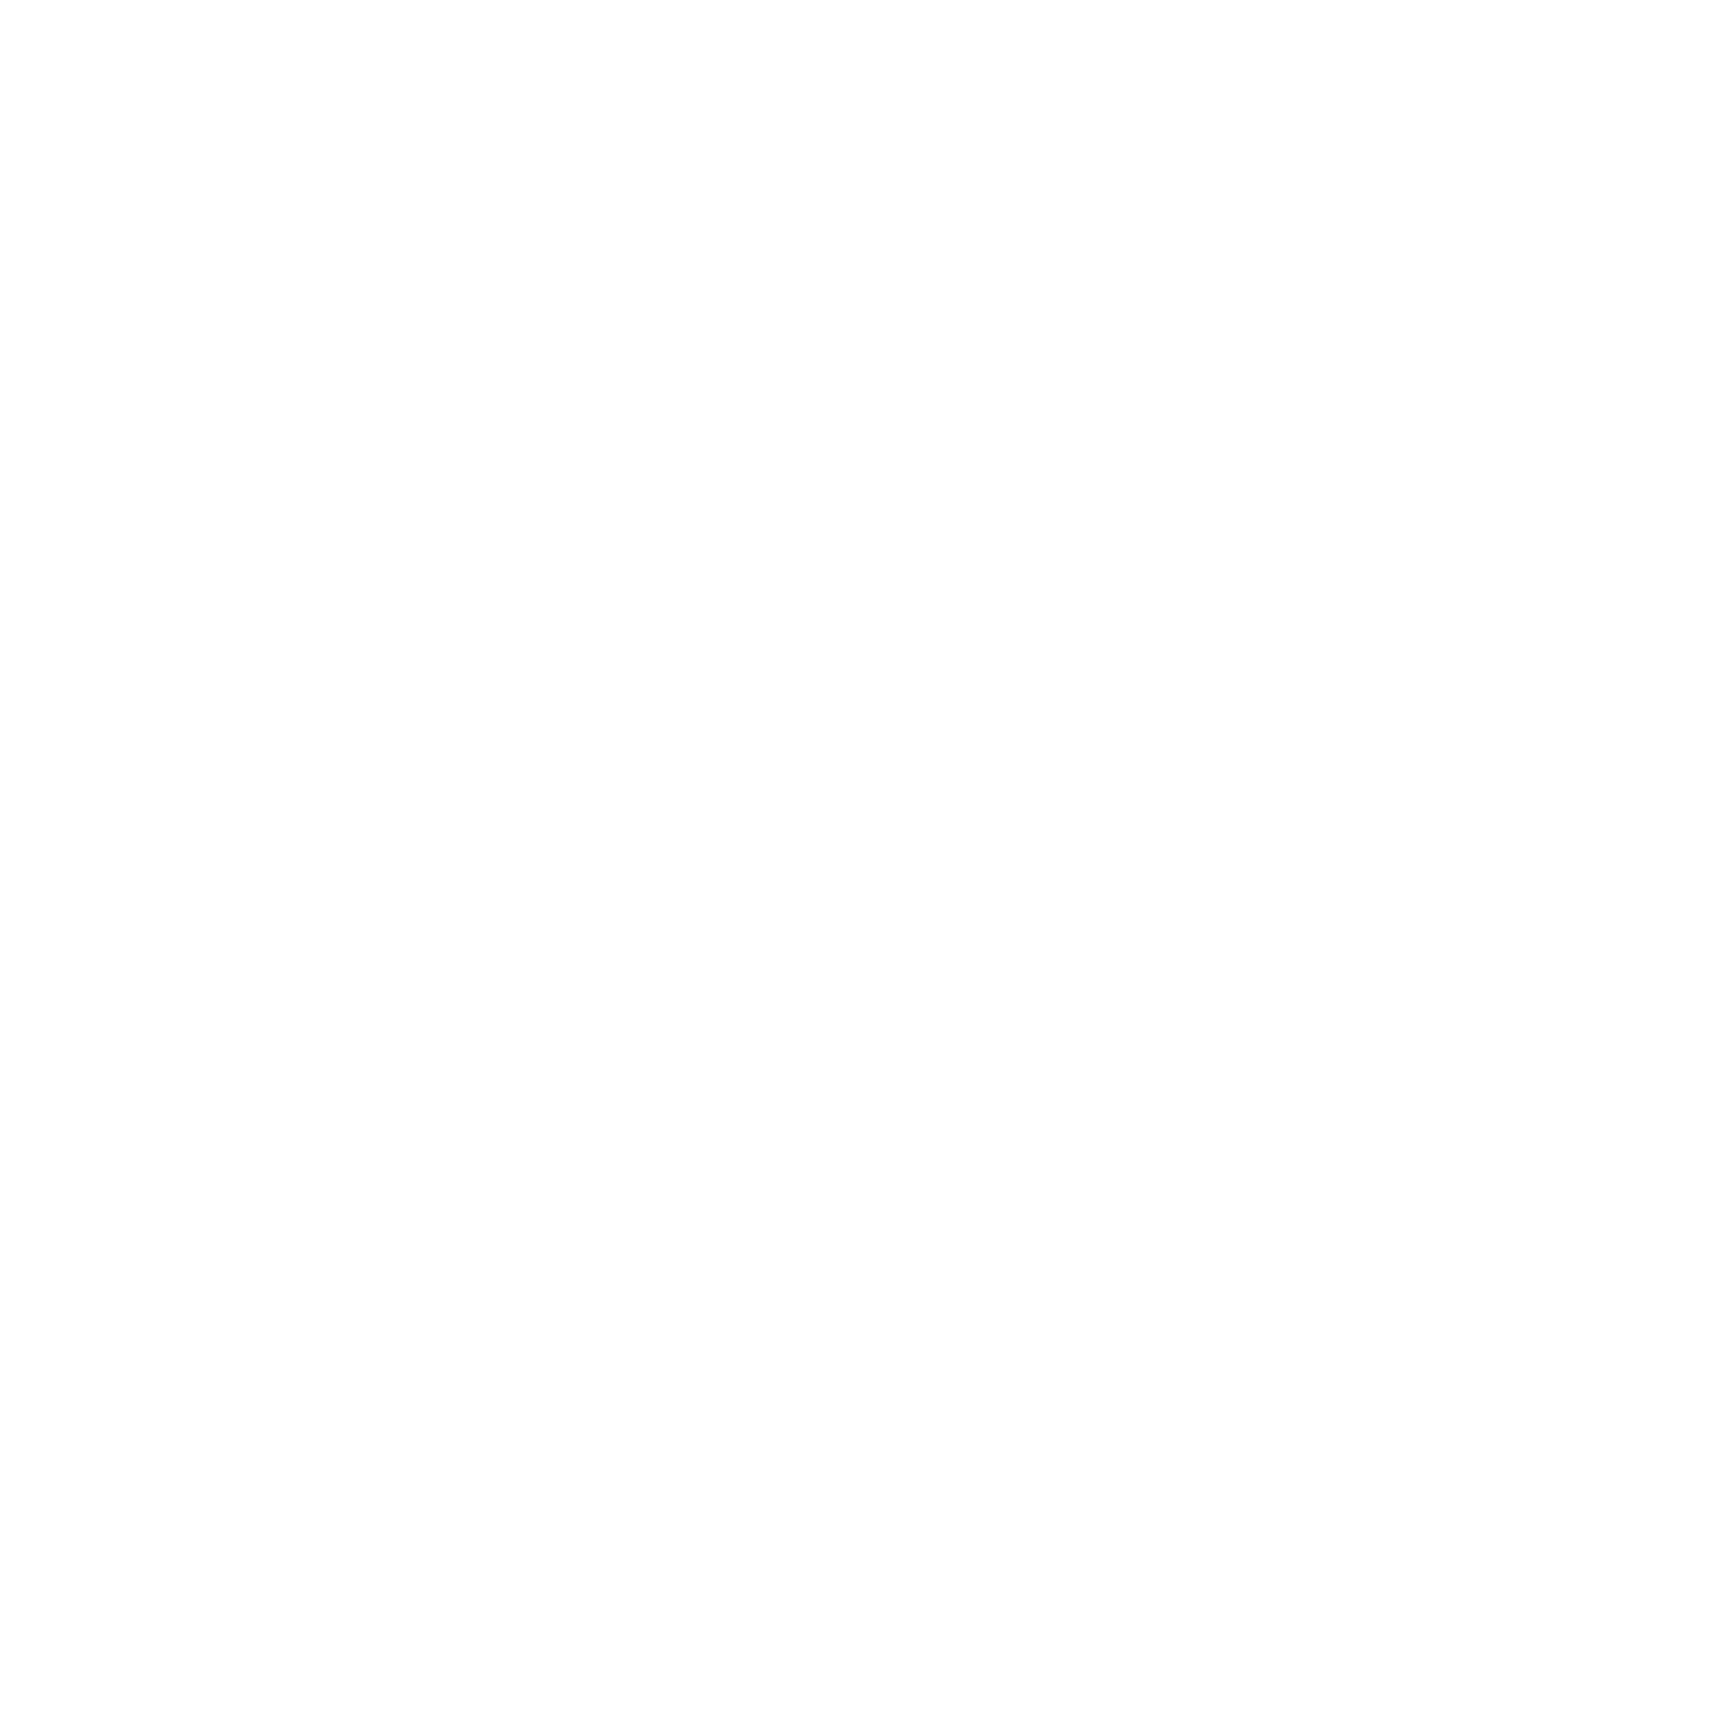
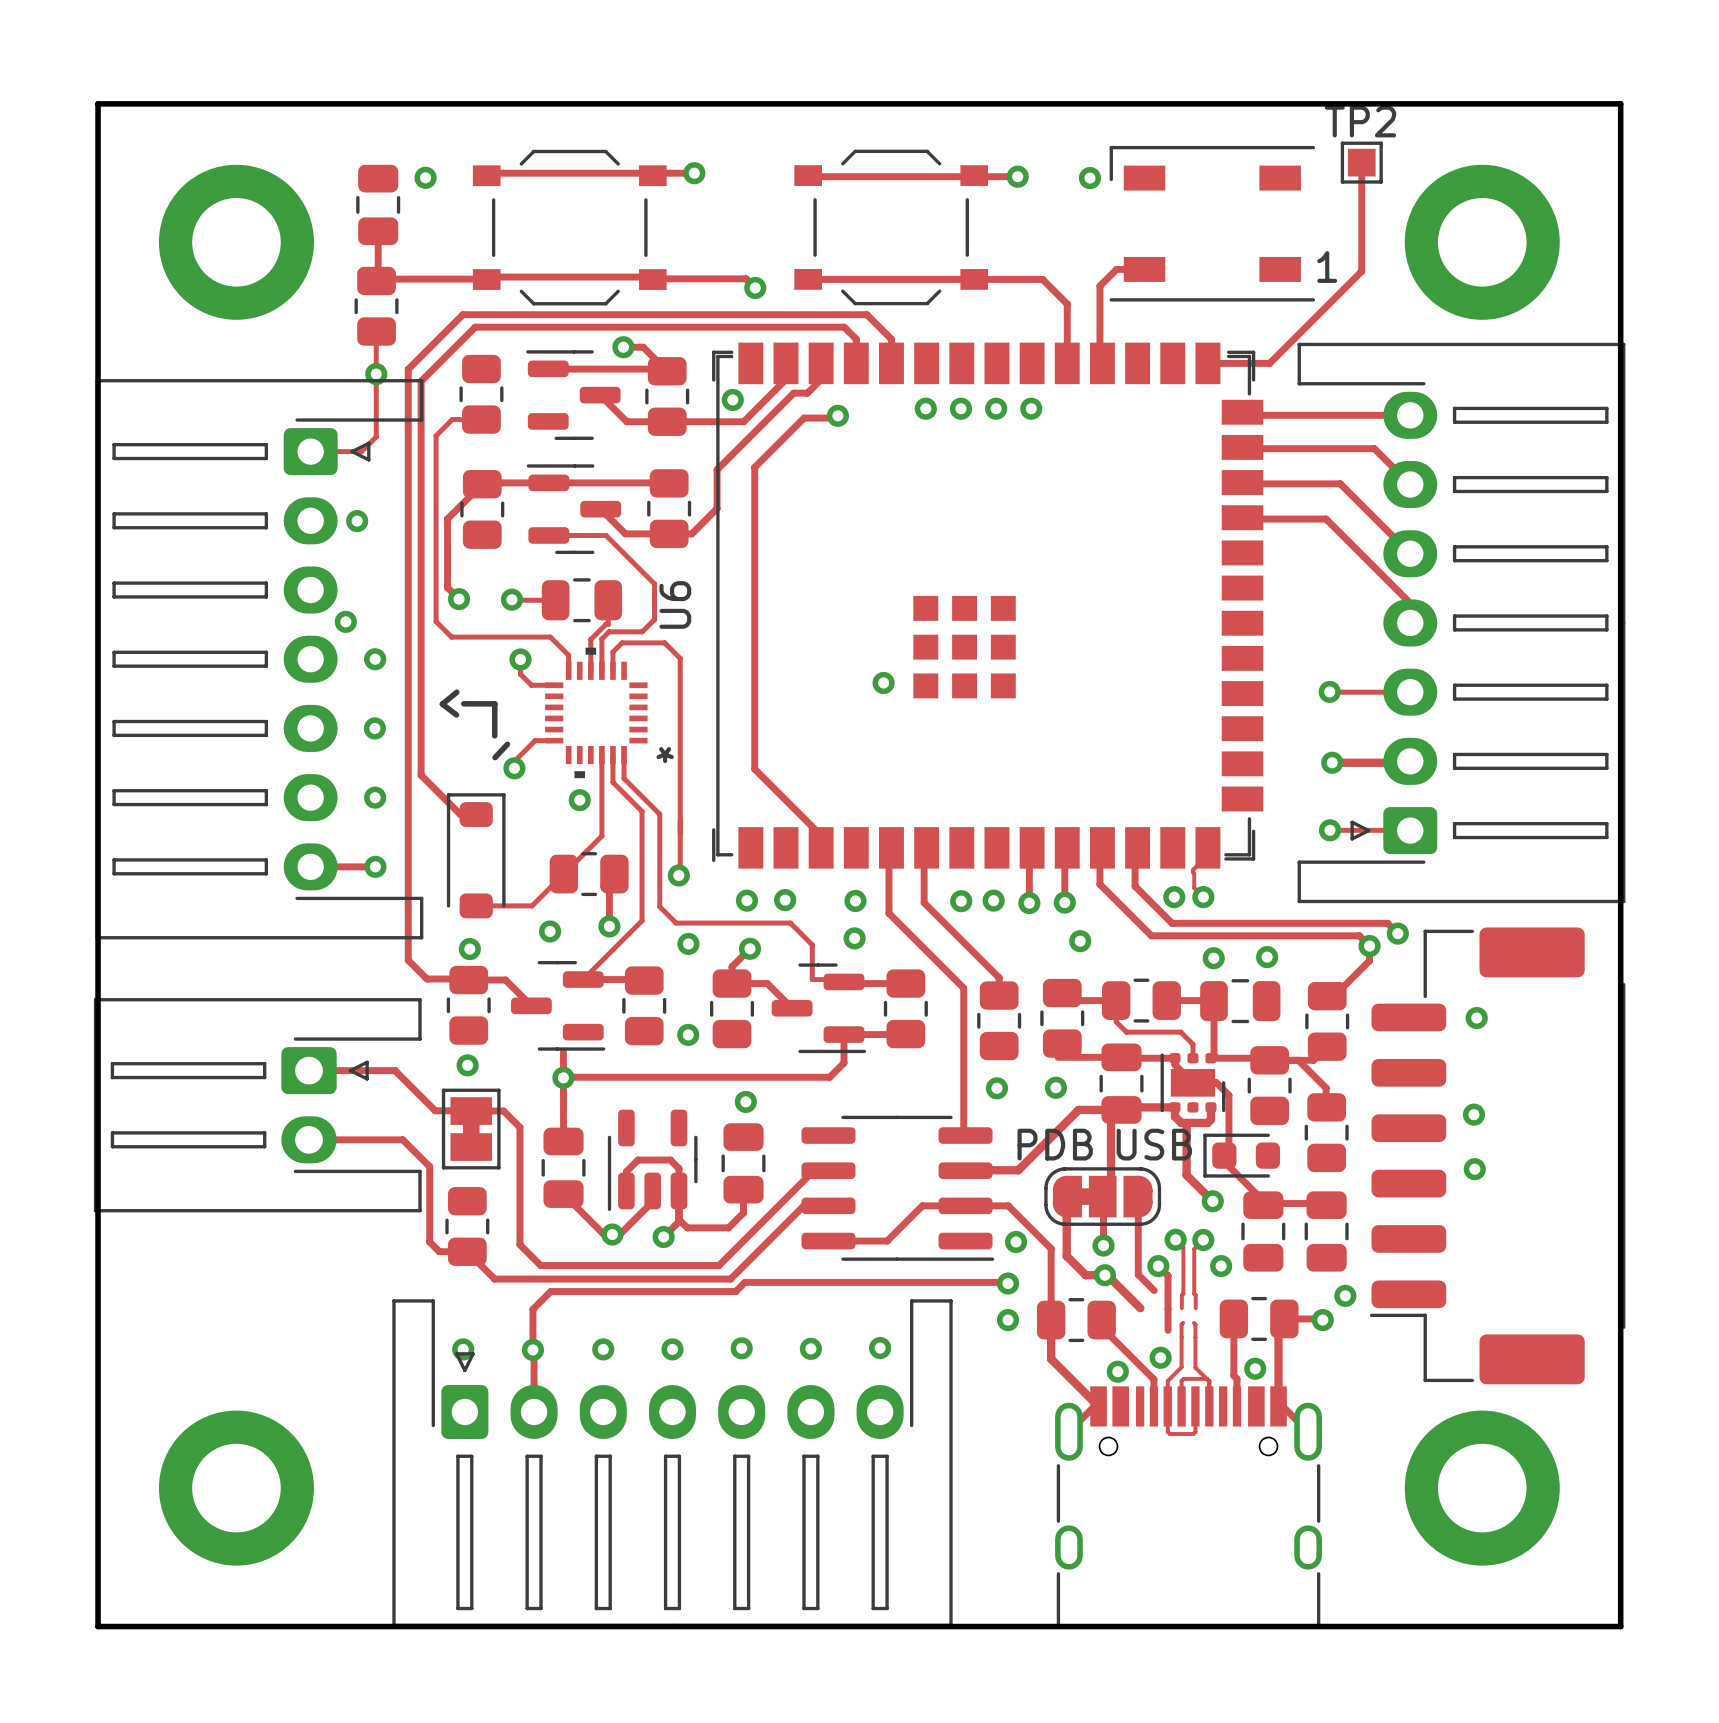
board edge: none -> (98, 103) (1620, 103) (1620, 1626) (98, 1626) (98, 103)
TP2: none -> (1361, 162)
track: none -> (809, 169) (816, 176) (1017, 176)
track: none -> (1361, 169) (1361, 271) (1269, 363) (1207, 363)
track: none -> (694, 173) (483, 173) (481, 175)
via: none -> (694, 173)
via: none -> (1017, 176)
via: none -> (425, 177)
via: none -> (1089, 178)
part: none -> (378, 204)
part: none -> (1212, 223)
part: none -> (569, 227)
part: none -> (891, 227)
track: none -> (378, 231) (378, 279)
part: none -> (236, 242)
part: none -> (1482, 242)
track: none -> (1144, 269) (1116, 269) (1099, 286) (1099, 364)
track: none -> (808, 279) (1042, 279) (1067, 304) (1066, 364)
track: none -> (376, 280) (378, 279) (481, 279) (483, 277) (650, 277) (651, 278) (746, 278) (755, 287)
via: none -> (755, 287)
part: none -> (376, 306)
track: none -> (376, 331) (376, 436) (361, 451) (310, 451)
track: none -> (623, 347) (643, 347) (667, 371)
via: none -> (623, 347)
track: none -> (785, 363) (785, 379) (743, 421) (626, 421) (600, 395)
track: none -> (821, 363) (821, 379) (807, 393) (793, 393) (717, 469) (717, 508) (691, 533) (625, 533) (600, 509)
track: none -> (891, 363) (891, 339) (866, 314) (462, 314) (408, 369) (408, 960) (426, 978) (505, 980) (531, 1005)
track: none -> (548, 369) (665, 369)
via: none -> (376, 374)
track: none -> (856, 379) (856, 339) (844, 327) (475, 327) (421, 381) (421, 775) (460, 814) (476, 814)
part: none -> (481, 394)
part: none -> (573, 395)
part: none -> (667, 396)
via: none -> (732, 399)
via: none -> (925, 408)
via: none -> (960, 408)
via: none -> (996, 408)
via: none -> (1031, 408)
track: none -> (1240, 413) (1241, 415) (1410, 415)
track: none -> (837, 415) (835, 418) (804, 418) (754, 467) (754, 769) (818, 833) (818, 849)
via: none -> (837, 415)
track: none -> (479, 419) (481, 419) (452, 419) (436, 435) (436, 621) (451, 637) (550, 637) (568, 655) (568, 670)
track: none -> (1240, 448) (1374, 448) (1410, 484)
track: none -> (669, 483) (483, 482) (447, 518) (447, 587) (459, 599)
track: none -> (1240, 483) (1340, 483) (1410, 553)
part: none -> (669, 508)
part: none -> (482, 509)
part: none -> (573, 509)
track: none -> (1240, 519) (1326, 519) (1410, 603) (1410, 622)
via: none -> (357, 521)
track: none -> (554, 535) (548, 535) (606, 535) (654, 583) (654, 619) (642, 631) (609, 631) (601, 639) (601, 670)
via: none -> (459, 599)
track: none -> (511, 599) (555, 600)
via: none -> (511, 599)
part: none -> (581, 600)
track: none -> (608, 600) (608, 624) (590, 639) (590, 670)
U6: none -> (987, 605)
via: none -> (345, 621)
part: none -> (1461, 622)
part: none -> (259, 659)
via: none -> (375, 659)
track: none -> (520, 659) (520, 674) (531, 685) (554, 685)
via: none -> (520, 659)
track: none -> (612, 670) (612, 652) (622, 642) (664, 642) (680, 658) (678, 875)
via: none -> (883, 682)
via: none -> (1329, 691)
line: none -> (456, 692) (442, 704) (456, 714)
track: none -> (1330, 692) (1410, 692)
line: none -> (463, 703) (494, 703) (494, 735)
part: none -> (596, 712)
via: none -> (374, 728)
track: none -> (554, 740) (535, 740) (514, 761) (514, 768)
line: none -> (507, 744) (495, 757)
track: none -> (601, 755) (601, 836) (532, 905) (476, 905)
track: none -> (612, 755) (612, 782) (642, 811) (642, 920) (583, 979) (644, 980)
track: none -> (624, 755) (624, 778) (659, 814) (659, 906) (676, 923) (790, 923) (812, 944) (812, 979) (841, 979) (845, 983) (905, 983)
track: none -> (1410, 761) (1332, 762)
via: none -> (1332, 762)
via: none -> (514, 768)
via: none -> (375, 797)
via: none -> (579, 800)
track: none -> (1330, 830) (1410, 830)
via: none -> (1330, 830)
track: none -> (888, 849) (888, 913) (963, 988) (963, 1133) (965, 1135)
track: none -> (924, 849) (924, 902) (999, 977) (999, 995)
track: none -> (1029, 849) (1029, 903)
track: none -> (1064, 849) (1064, 902)
track: none -> (1099, 849) (1099, 884) (1151, 935) (1359, 935) (1369, 946) (1369, 960) (1334, 996) (1327, 996)
track: none -> (1135, 849) (1135, 886) (1172, 923) (1387, 923) (1397, 933)
track: none -> (1205, 849) (1205, 857) (1193, 869) (1194, 888) (1203, 897)
part: none -> (476, 855)
track: none -> (310, 866) (375, 866)
via: none -> (375, 866)
part: none -> (589, 874)
via: none -> (678, 875)
track: none -> (603, 886) (609, 891) (609, 926)
via: none -> (1174, 897)
via: none -> (1203, 897)
via: none -> (746, 900)
via: none -> (785, 900)
via: none -> (855, 900)
via: none -> (993, 900)
via: none -> (961, 901)
via: none -> (1064, 902)
via: none -> (1029, 903)
via: none -> (609, 926)
via: none -> (550, 931)
via: none -> (1397, 933)
via: none -> (854, 938)
via: none -> (1080, 941)
via: none -> (688, 943)
via: none -> (1369, 946)
track: none -> (750, 948) (732, 966) (732, 983) (767, 983) (792, 1008)
via: none -> (750, 948)
via: none -> (469, 949)
via: none -> (1267, 957)
via: none -> (1213, 958)
track: none -> (1062, 993) (1069, 1000) (1116, 1000) (1116, 1021) (1126, 1032) (1180, 1032) (1192, 1044) (1192, 1058)
part: none -> (1141, 1000)
track: none -> (1166, 1000) (1214, 1001) (1214, 1055) (1210, 1058) (1313, 1060) (1327, 1046)
part: none -> (1240, 1001)
part: none -> (468, 1005)
part: none -> (558, 1005)
part: none -> (644, 1005)
part: none -> (732, 1008)
part: none -> (818, 1008)
part: none -> (905, 1008)
part: none -> (1062, 1018)
via: none -> (1476, 1018)
part: none -> (999, 1020)
part: none -> (1327, 1021)
via: none -> (688, 1034)
track: none -> (905, 1034) (843, 1034) (843, 1063) (829, 1077) (563, 1077)
track: none -> (563, 1052) (563, 1141)
track: none -> (1058, 1057) (1174, 1058) (1174, 1064) (1192, 1082) (1216, 1082) (1228, 1095) (1228, 1150) (1224, 1155) (1224, 1161) (1266, 1203) (1326, 1204)
track: none -> (1298, 1060) (1326, 1088) (1326, 1102)
via: none -> (467, 1065)
track: none -> (308, 1070) (395, 1070) (435, 1110) (470, 1110)
via: none -> (563, 1077)
part: none -> (1192, 1082)
part: none -> (1121, 1083)
part: none -> (1269, 1085)
via: none -> (1055, 1087)
via: none -> (996, 1088)
via: none -> (745, 1101)
part: none -> (257, 1105)
track: none -> (1210, 1107) (1210, 1119) (1207, 1122) (1181, 1122) (1174, 1116) (1174, 1107) (1124, 1107) (1121, 1109)
track: none -> (1121, 1109) (1111, 1120) (1111, 1188) (1102, 1196) (1103, 1245)
track: none -> (1121, 1109) (1078, 1109) (1018, 1170) (965, 1170)
track: none -> (471, 1111) (503, 1111) (519, 1127) (519, 1244) (540, 1265) (719, 1265) (813, 1170) (828, 1170)
via: none -> (1473, 1114)
track: none -> (1186, 1122) (1186, 1175) (1212, 1201)
part: none -> (471, 1129)
part: none -> (1326, 1132)
track: none -> (308, 1139) (402, 1139) (429, 1166) (429, 1241) (439, 1251) (467, 1251) (494, 1279) (730, 1279) (803, 1205) (828, 1205)
part: none -> (1241, 1155)
part: none -> (1497, 1155)
part: none -> (652, 1160)
part: none -> (743, 1163)
part: none -> (563, 1167)
via: none -> (1474, 1169)
part: none -> (897, 1188)
track: none -> (743, 1189) (743, 1212) (728, 1227) (687, 1227) (678, 1219)
track: none -> (626, 1190) (626, 1171) (638, 1160) (670, 1160) (678, 1168) (678, 1221) (663, 1237)
track: none -> (652, 1190) (652, 1201) (619, 1234) (603, 1234) (563, 1194)
track: none -> (1066, 1196) (1066, 1256) (1085, 1275) (1107, 1275) (1140, 1308)
part: none -> (1102, 1196)
track: none -> (1144, 1197) (1138, 1197) (1138, 1274) (1154, 1290)
via: none -> (1212, 1201)
part: none -> (467, 1226)
part: none -> (1263, 1231)
part: none -> (1326, 1231)
via: none -> (612, 1234)
via: none -> (663, 1237)
track: none -> (1175, 1239) (1183, 1247) (1181, 1308)
via: none -> (1175, 1239)
track: none -> (1203, 1239) (1194, 1249) (1195, 1308)
via: none -> (1203, 1239)
track: none -> (828, 1241) (887, 1241) (922, 1205) (1008, 1205) (1051, 1248) (1051, 1359) (1098, 1406) (1094, 1406) (1068, 1431)
via: none -> (1016, 1241)
via: none -> (1103, 1245)
track: none -> (1158, 1266) (1168, 1275) (1168, 1330)
via: none -> (1158, 1266)
via: none -> (1221, 1266)
via: none -> (1104, 1275)
track: none -> (1008, 1283) (744, 1282) (735, 1291) (550, 1291) (532, 1309) (534, 1411)
via: none -> (1008, 1283)
via: none -> (1345, 1295)
track: none -> (1233, 1318) (1233, 1375) (1236, 1378) (1236, 1406)
part: none -> (1259, 1318)
via: none -> (1008, 1320)
part: none -> (1076, 1320)
track: none -> (1101, 1320) (1101, 1327) (1153, 1379) (1153, 1406)
track: none -> (1322, 1320) (1284, 1318) (1278, 1324) (1278, 1406) (1282, 1406) (1308, 1431)
via: none -> (1322, 1320)
track: none -> (1183, 1322) (1181, 1367) (1167, 1381) (1167, 1431) (1169, 1434) (1193, 1434) (1195, 1431) (1195, 1406)
track: none -> (1193, 1322) (1195, 1367) (1209, 1381)
via: none -> (741, 1348)
via: none -> (810, 1348)
via: none -> (880, 1348)
via: none -> (463, 1349)
via: none -> (532, 1349)
via: none -> (603, 1349)
via: none -> (672, 1349)
via: none -> (1160, 1357)
via: none -> (1255, 1368)
via: none -> (1117, 1371)
track: none -> (1181, 1406) (1181, 1381) (1183, 1378) (1207, 1378) (1209, 1381) (1209, 1406)
part: none -> (672, 1463)
part: none -> (236, 1488)
part: none -> (1482, 1488)
part: none -> (1188, 1507)

